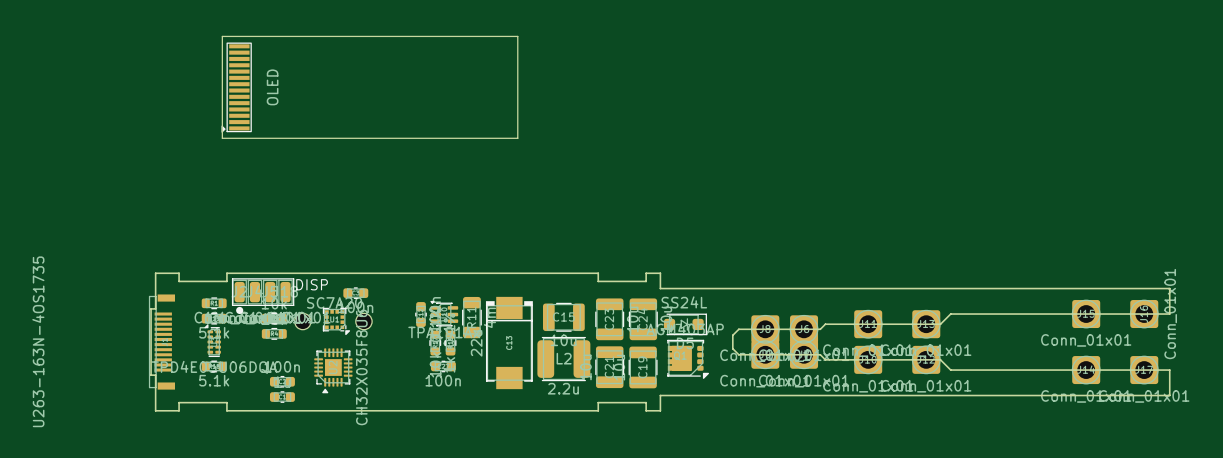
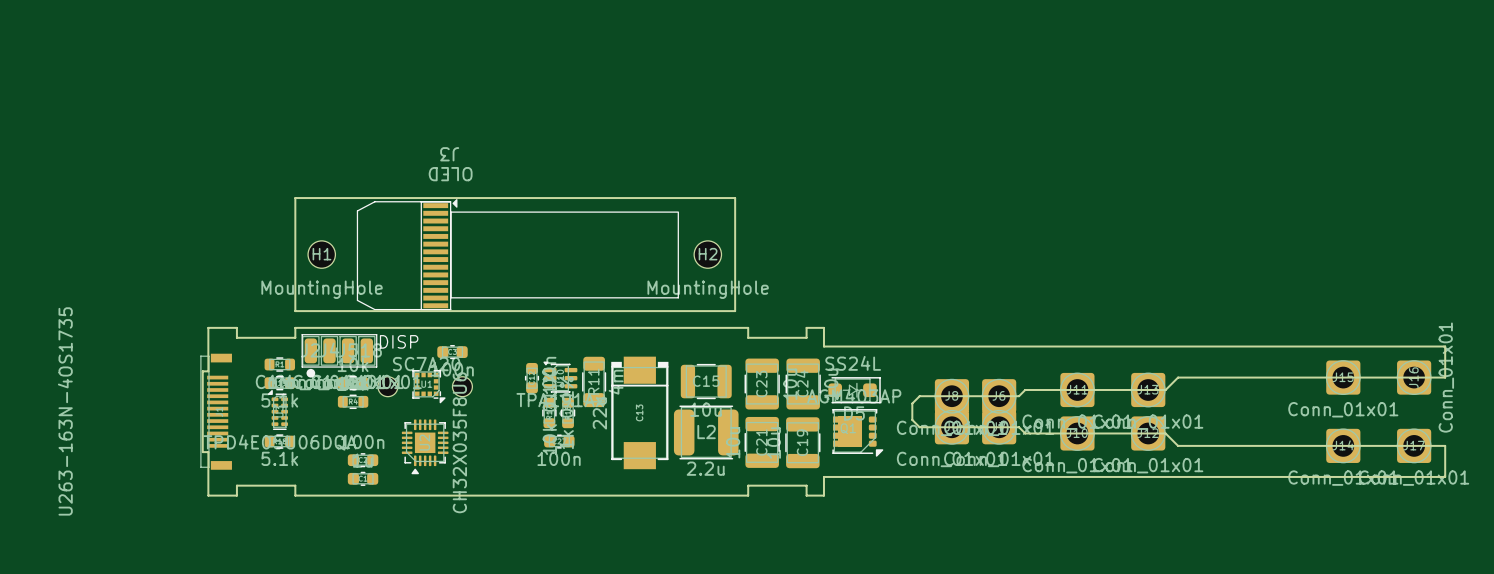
board edge: (222, 36) (517, 36) (517, 138) (222, 138) (222, 36) -> none
part: OLED (236, 87) -> none
board edge: none -> (295, 198) (735, 198) (735, 311) (295, 311) (295, 198)
H1: none -> MountingHole (321, 254)
J3: none -> OLED (517, 254)
H2: none -> MountingHole (707, 254)

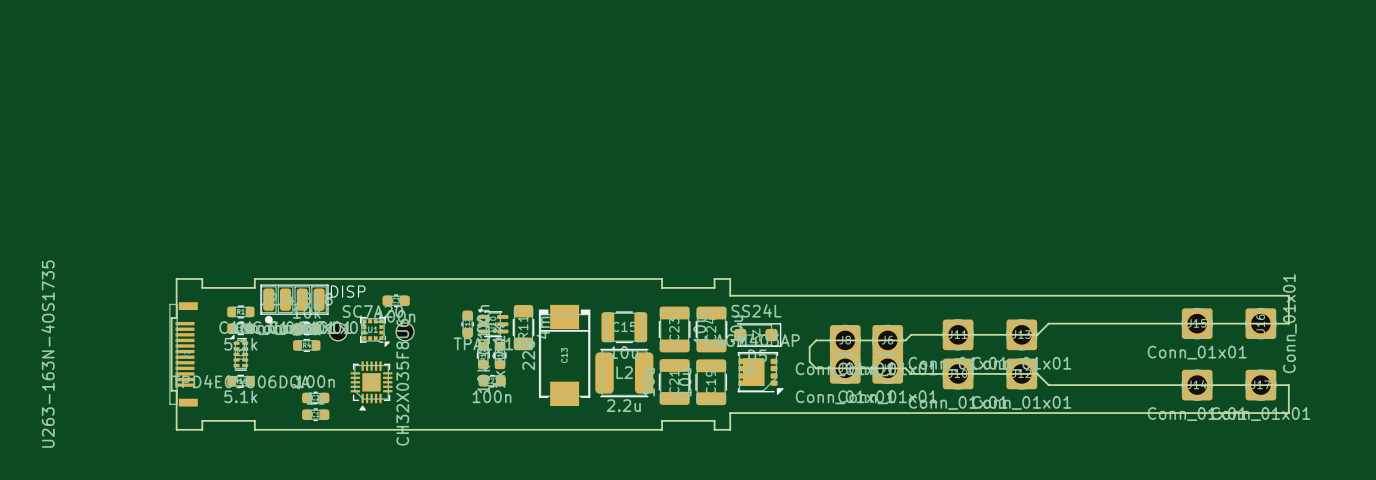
board edge: (295, 198) (735, 198) (735, 311) (295, 311) (295, 198) -> none
H1: MountingHole (321, 254) -> none
J3: OLED (517, 254) -> none
H2: MountingHole (707, 254) -> none

